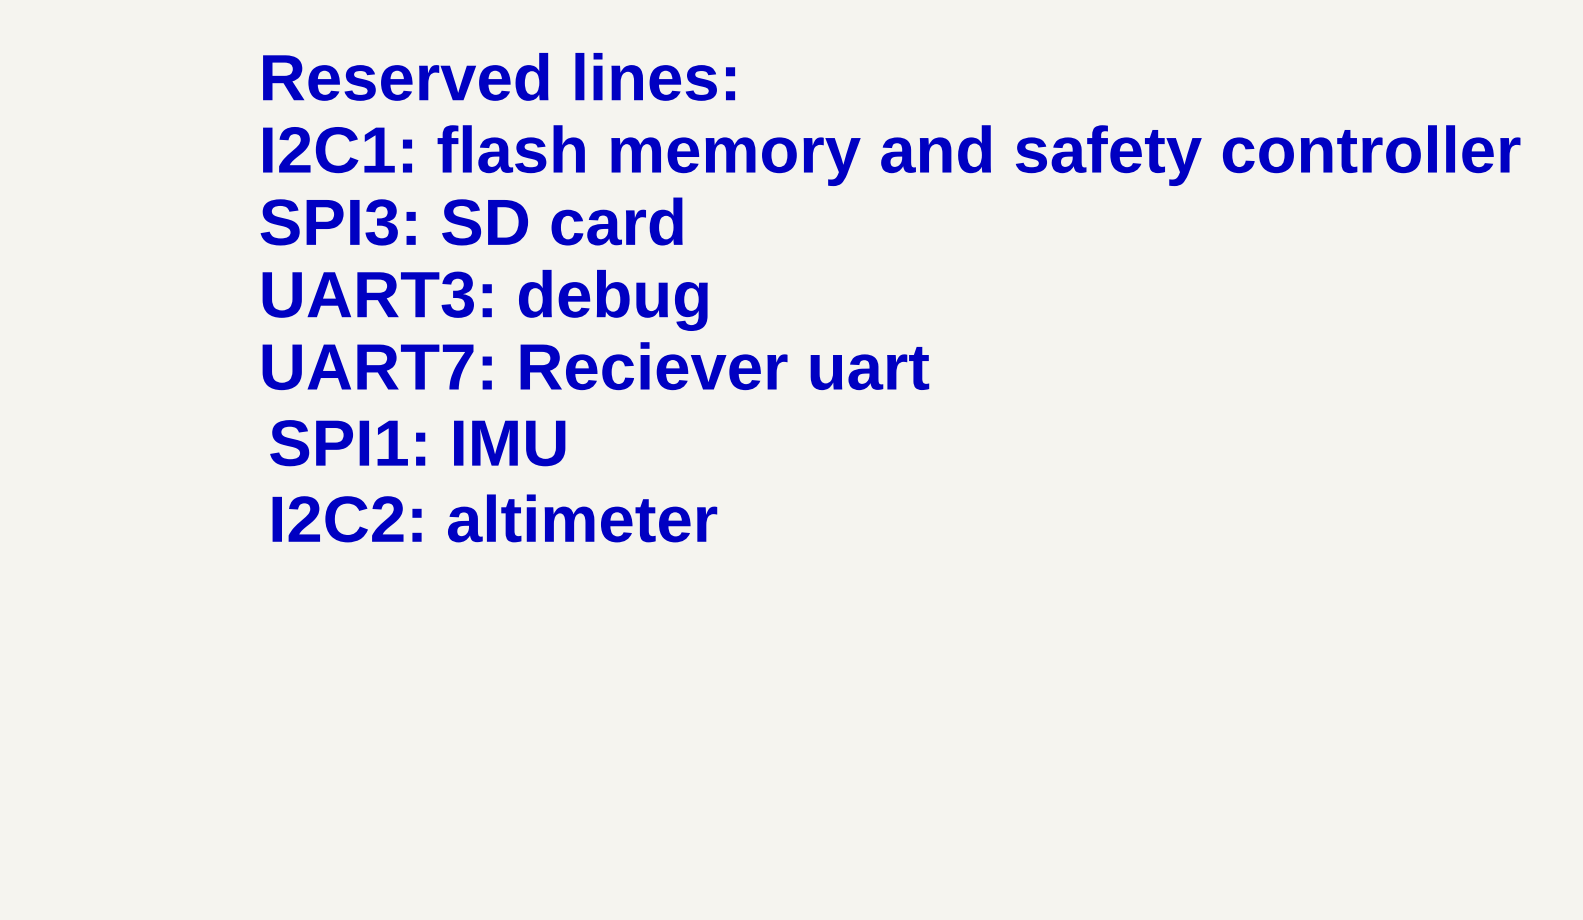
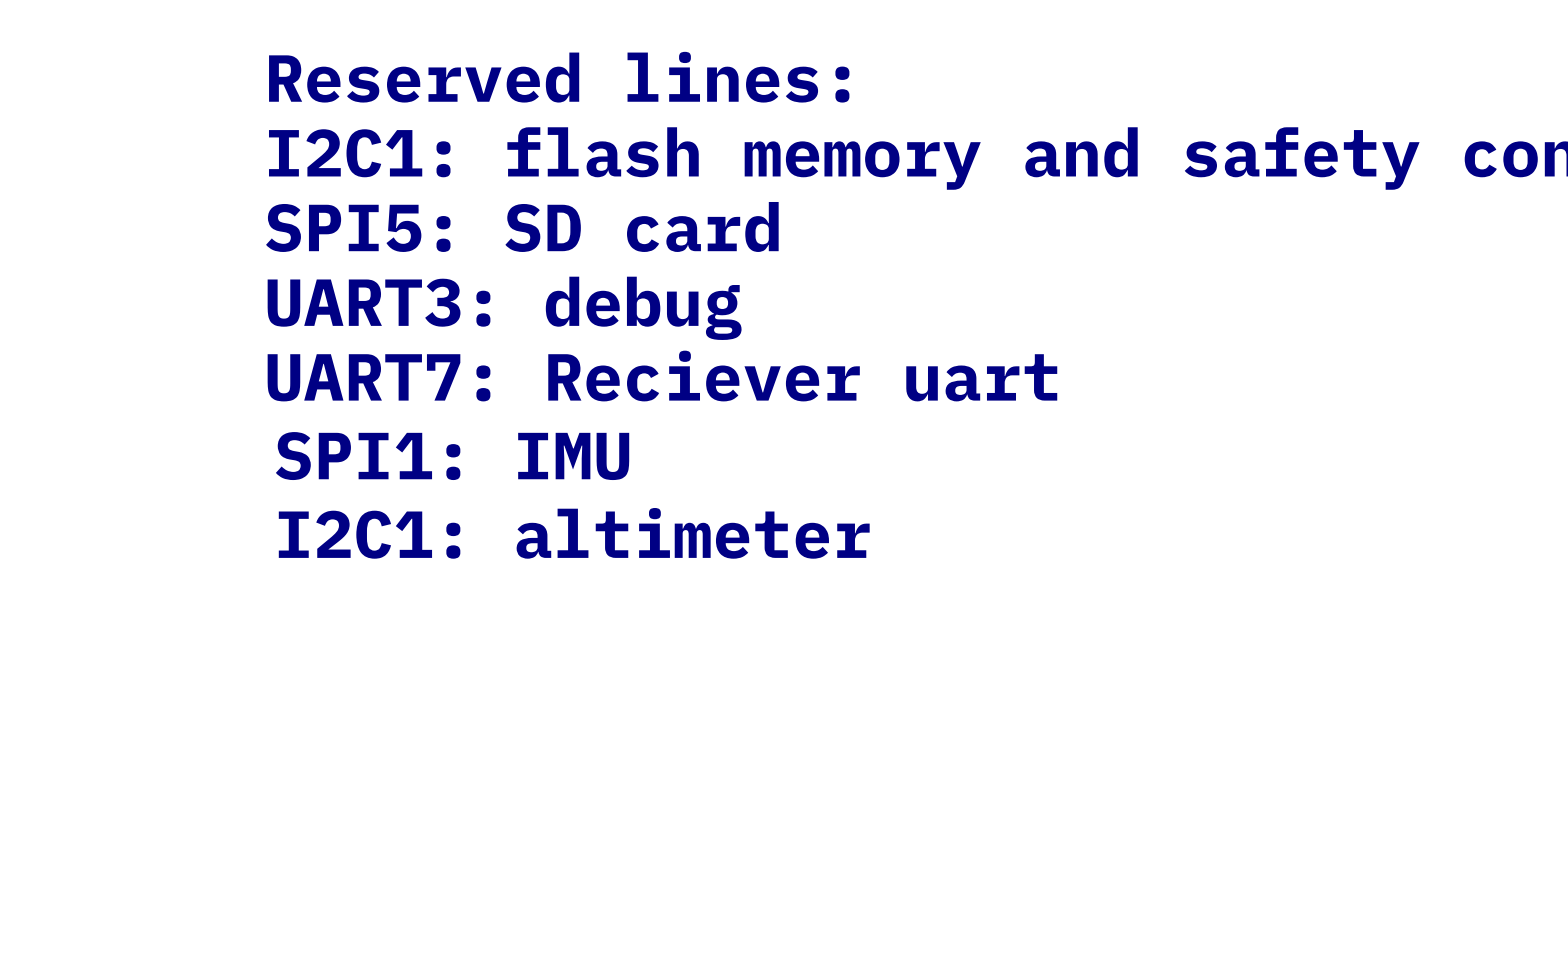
text: SPI3: SD card (471, 221) -> SPI5: SD card (522, 226)
text: I2C2: altimeter (494, 518) -> I2C1: altimeter (574, 533)

